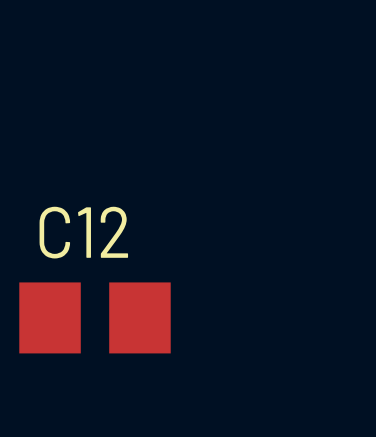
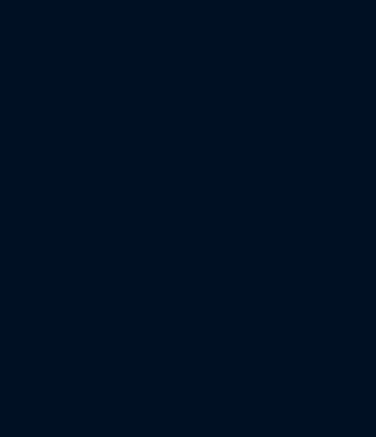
C12: (95, 317) -> none

